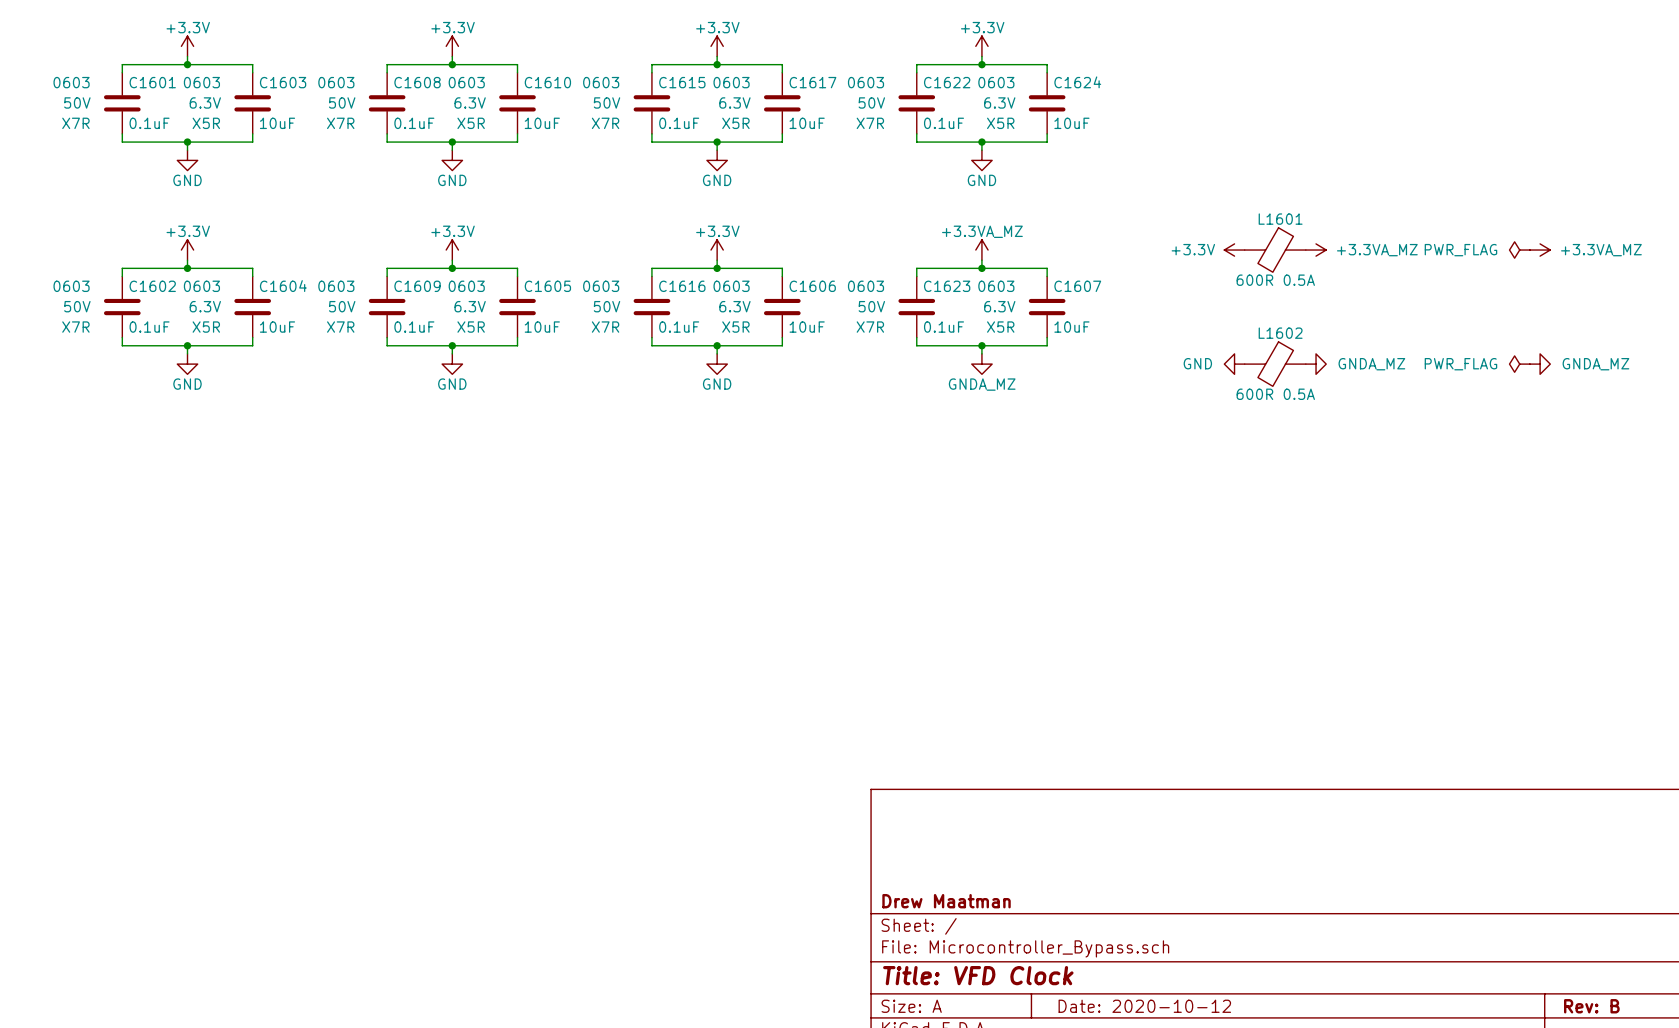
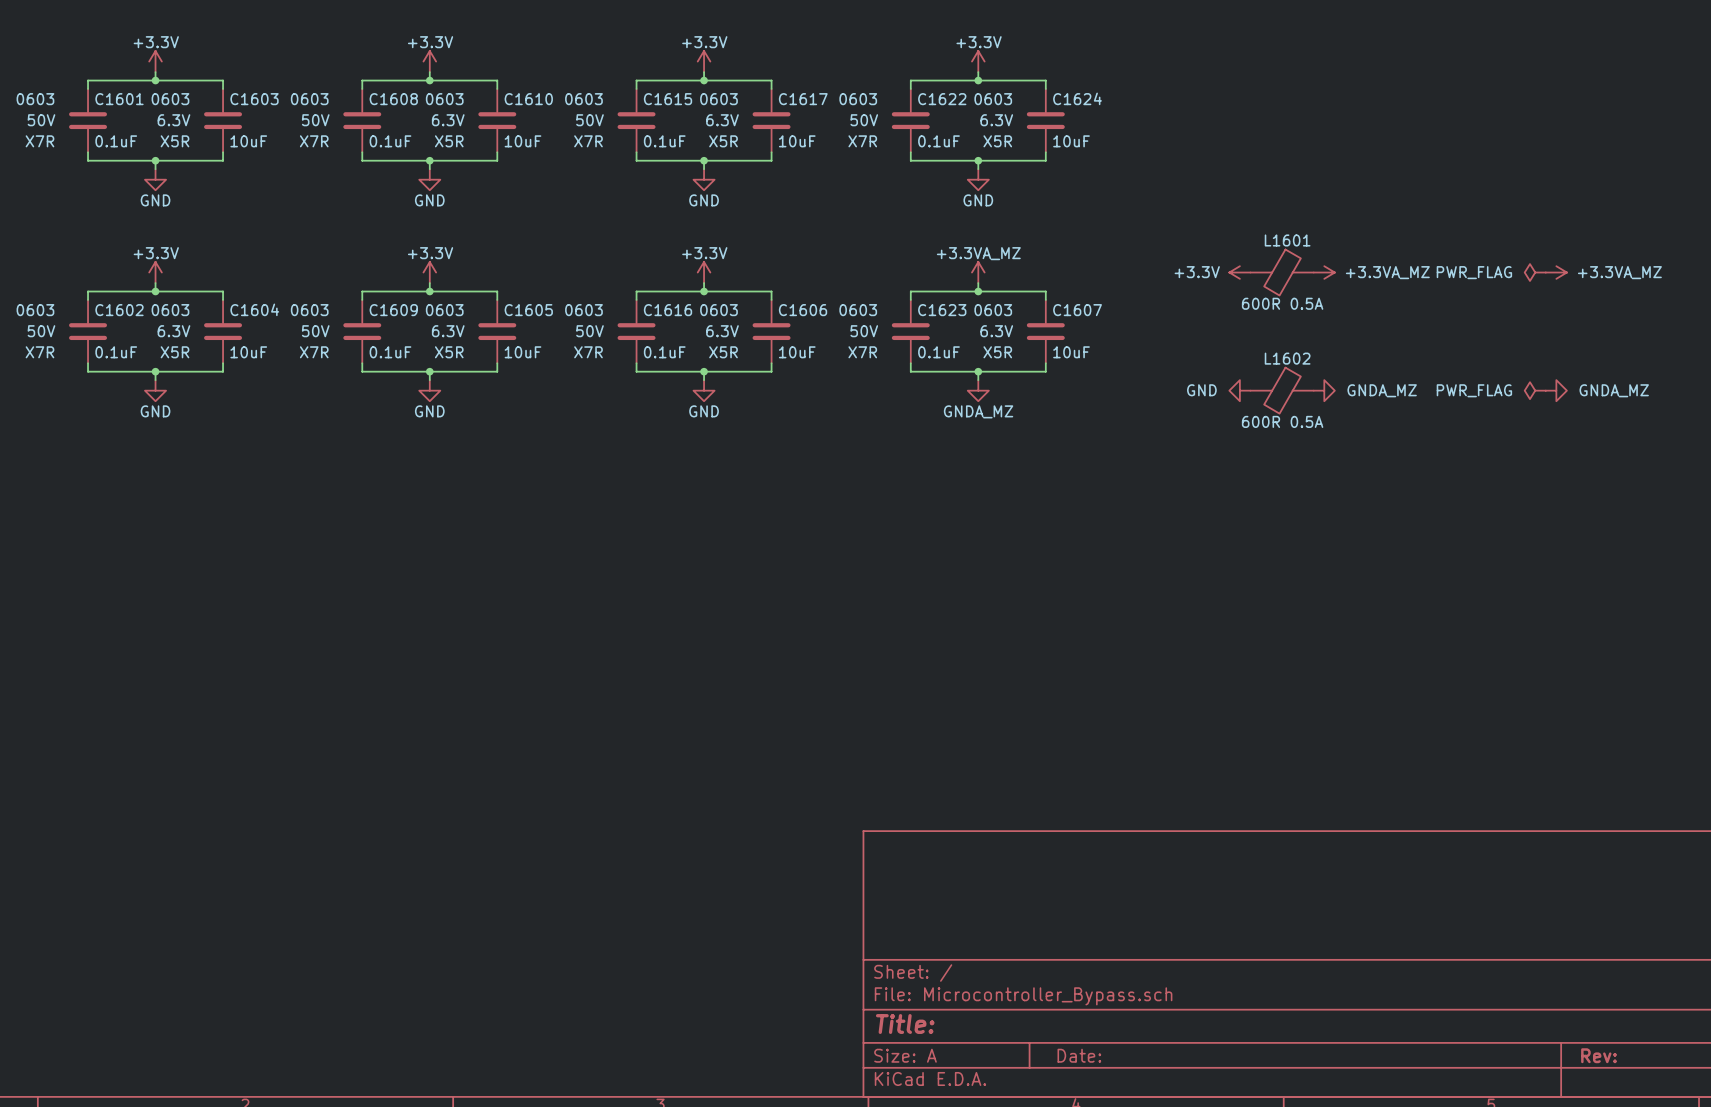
title block: Drew Maatman (946, 901) -> none
title block: Title: VFD Clock (978, 975) -> Title: (905, 1024)
title block: Date: 2020-10-12 (1144, 1006) -> Date: (1079, 1055)
title block: Rev: B (1591, 1006) -> Rev: (1598, 1055)

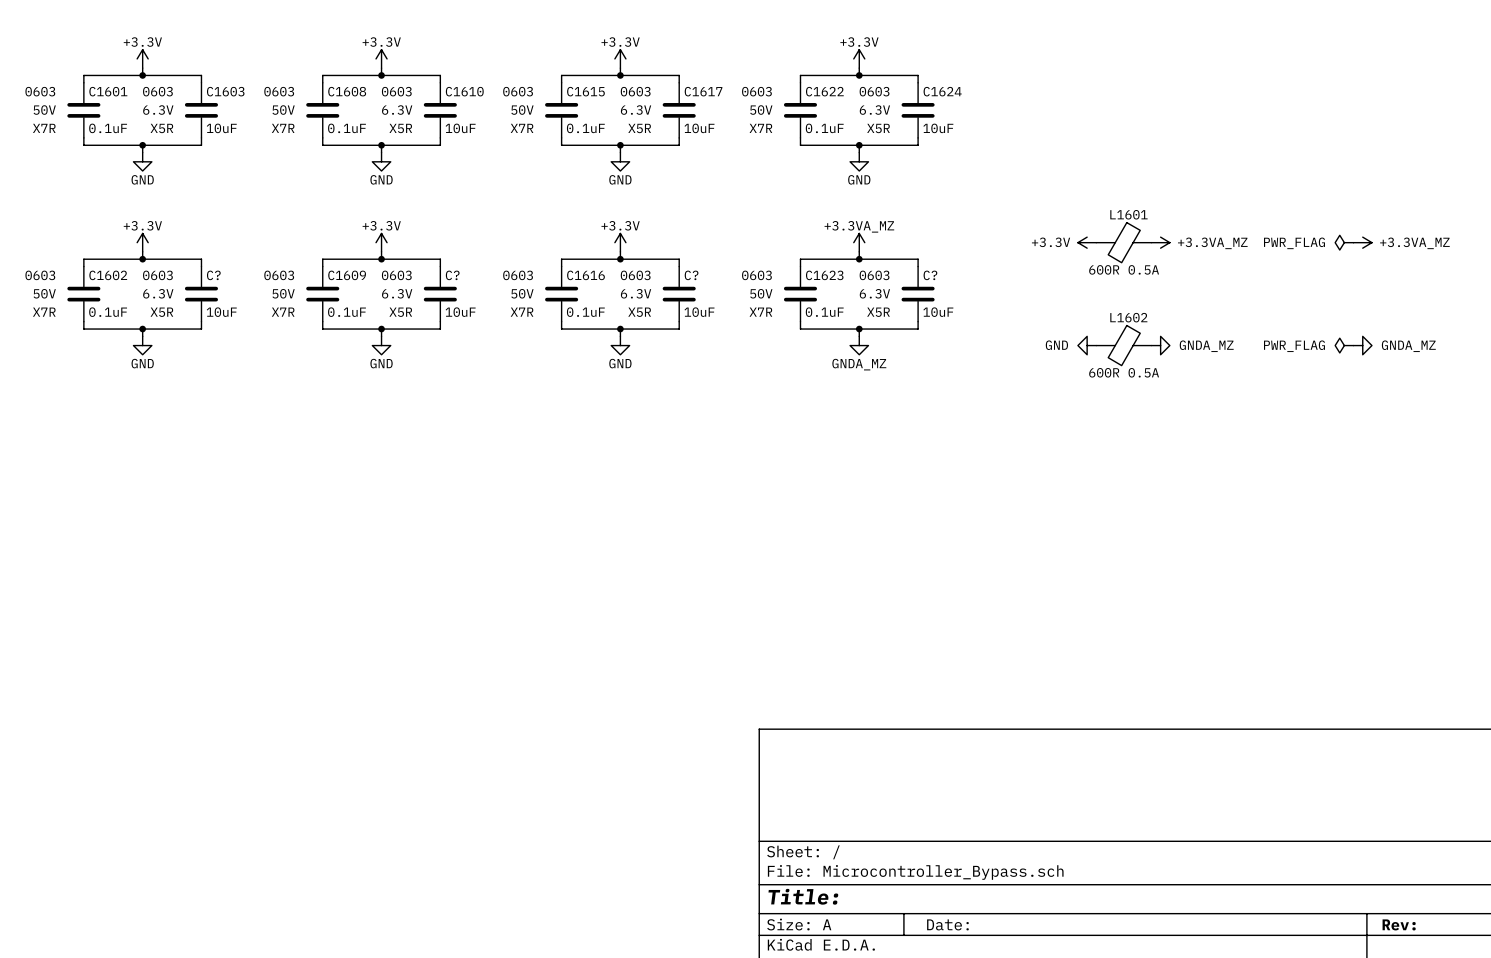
C1604 name: C1604 (254, 309) -> C? (213, 275)
C1605 name: C1605 (528, 310) -> C? (452, 275)
C1606 name: C1606 (803, 310) -> C? (691, 275)
C1607 name: C1607 (1077, 310) -> C? (930, 275)

